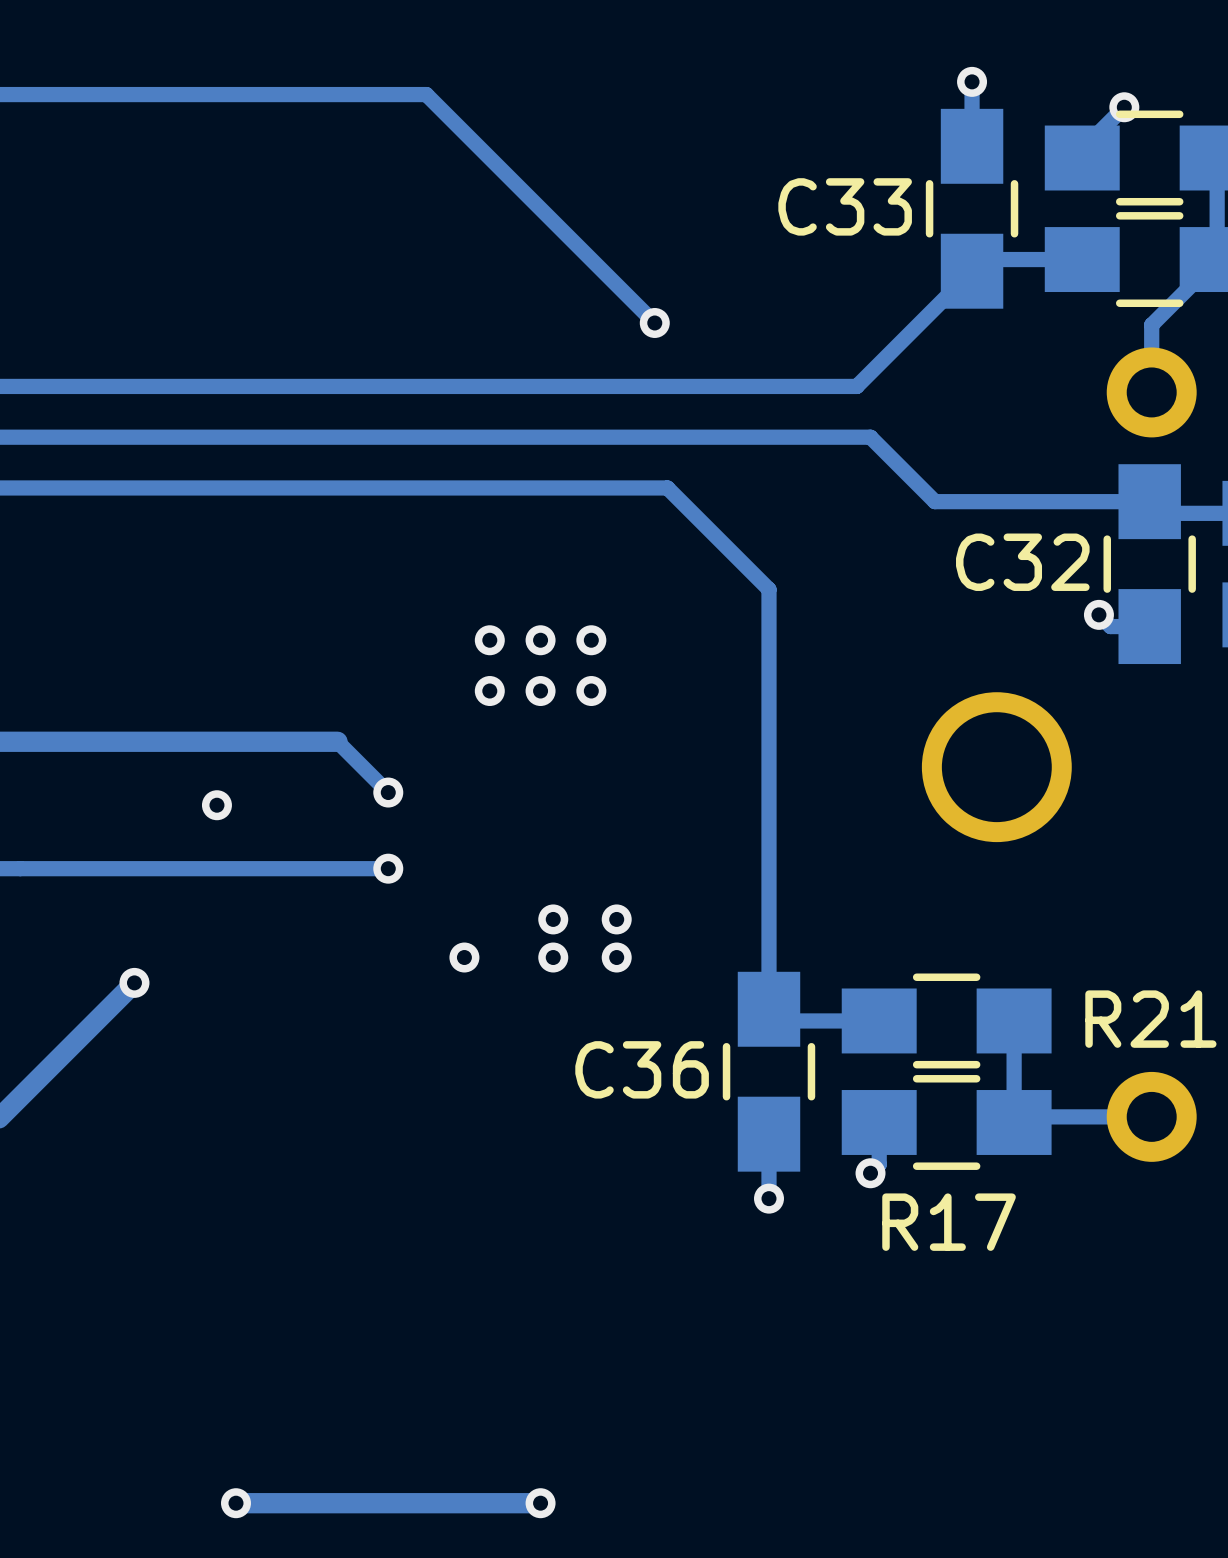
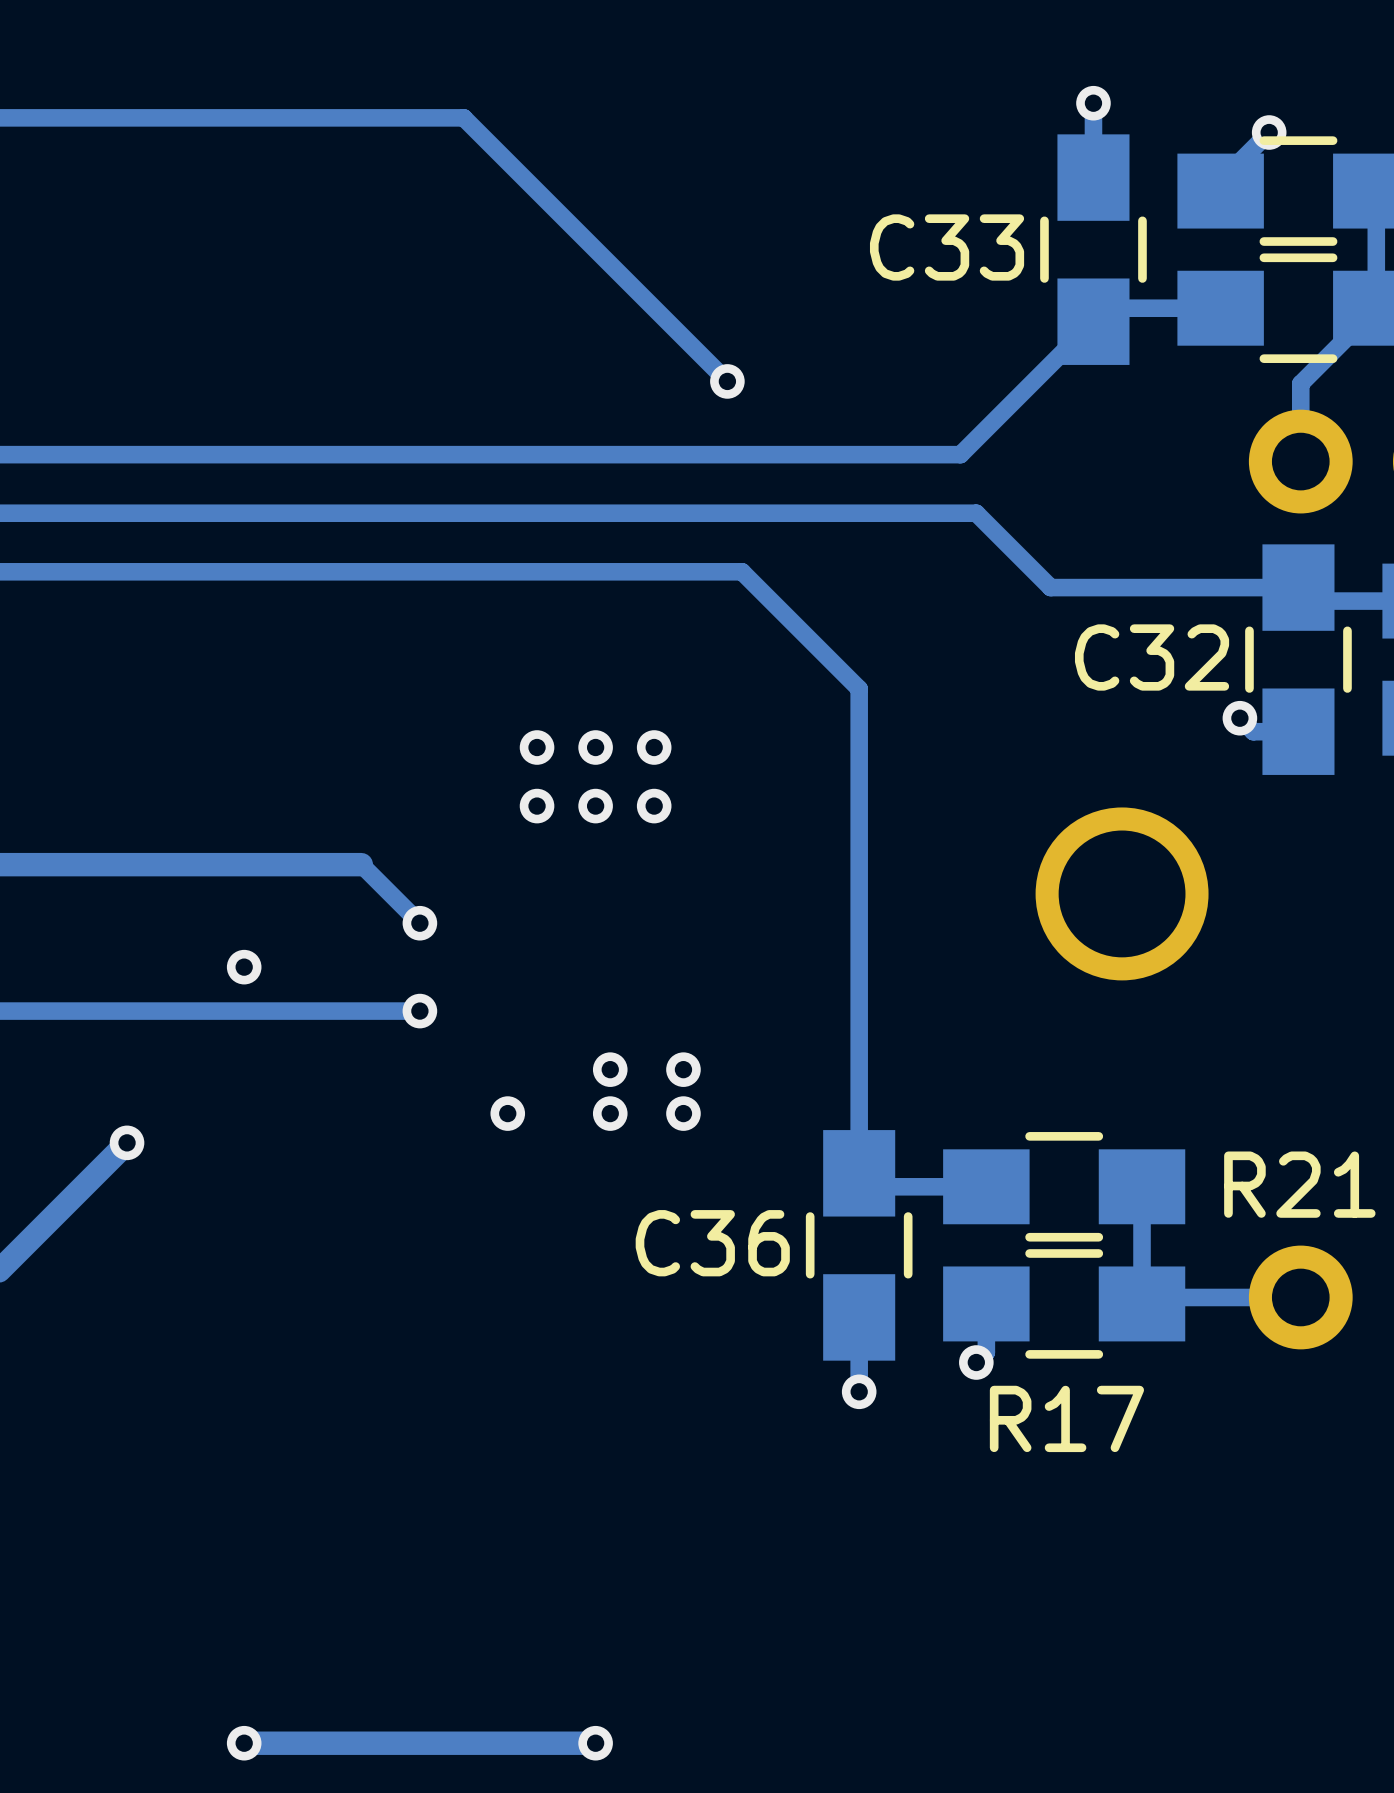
via position: (216, 805) -> (244, 967)

